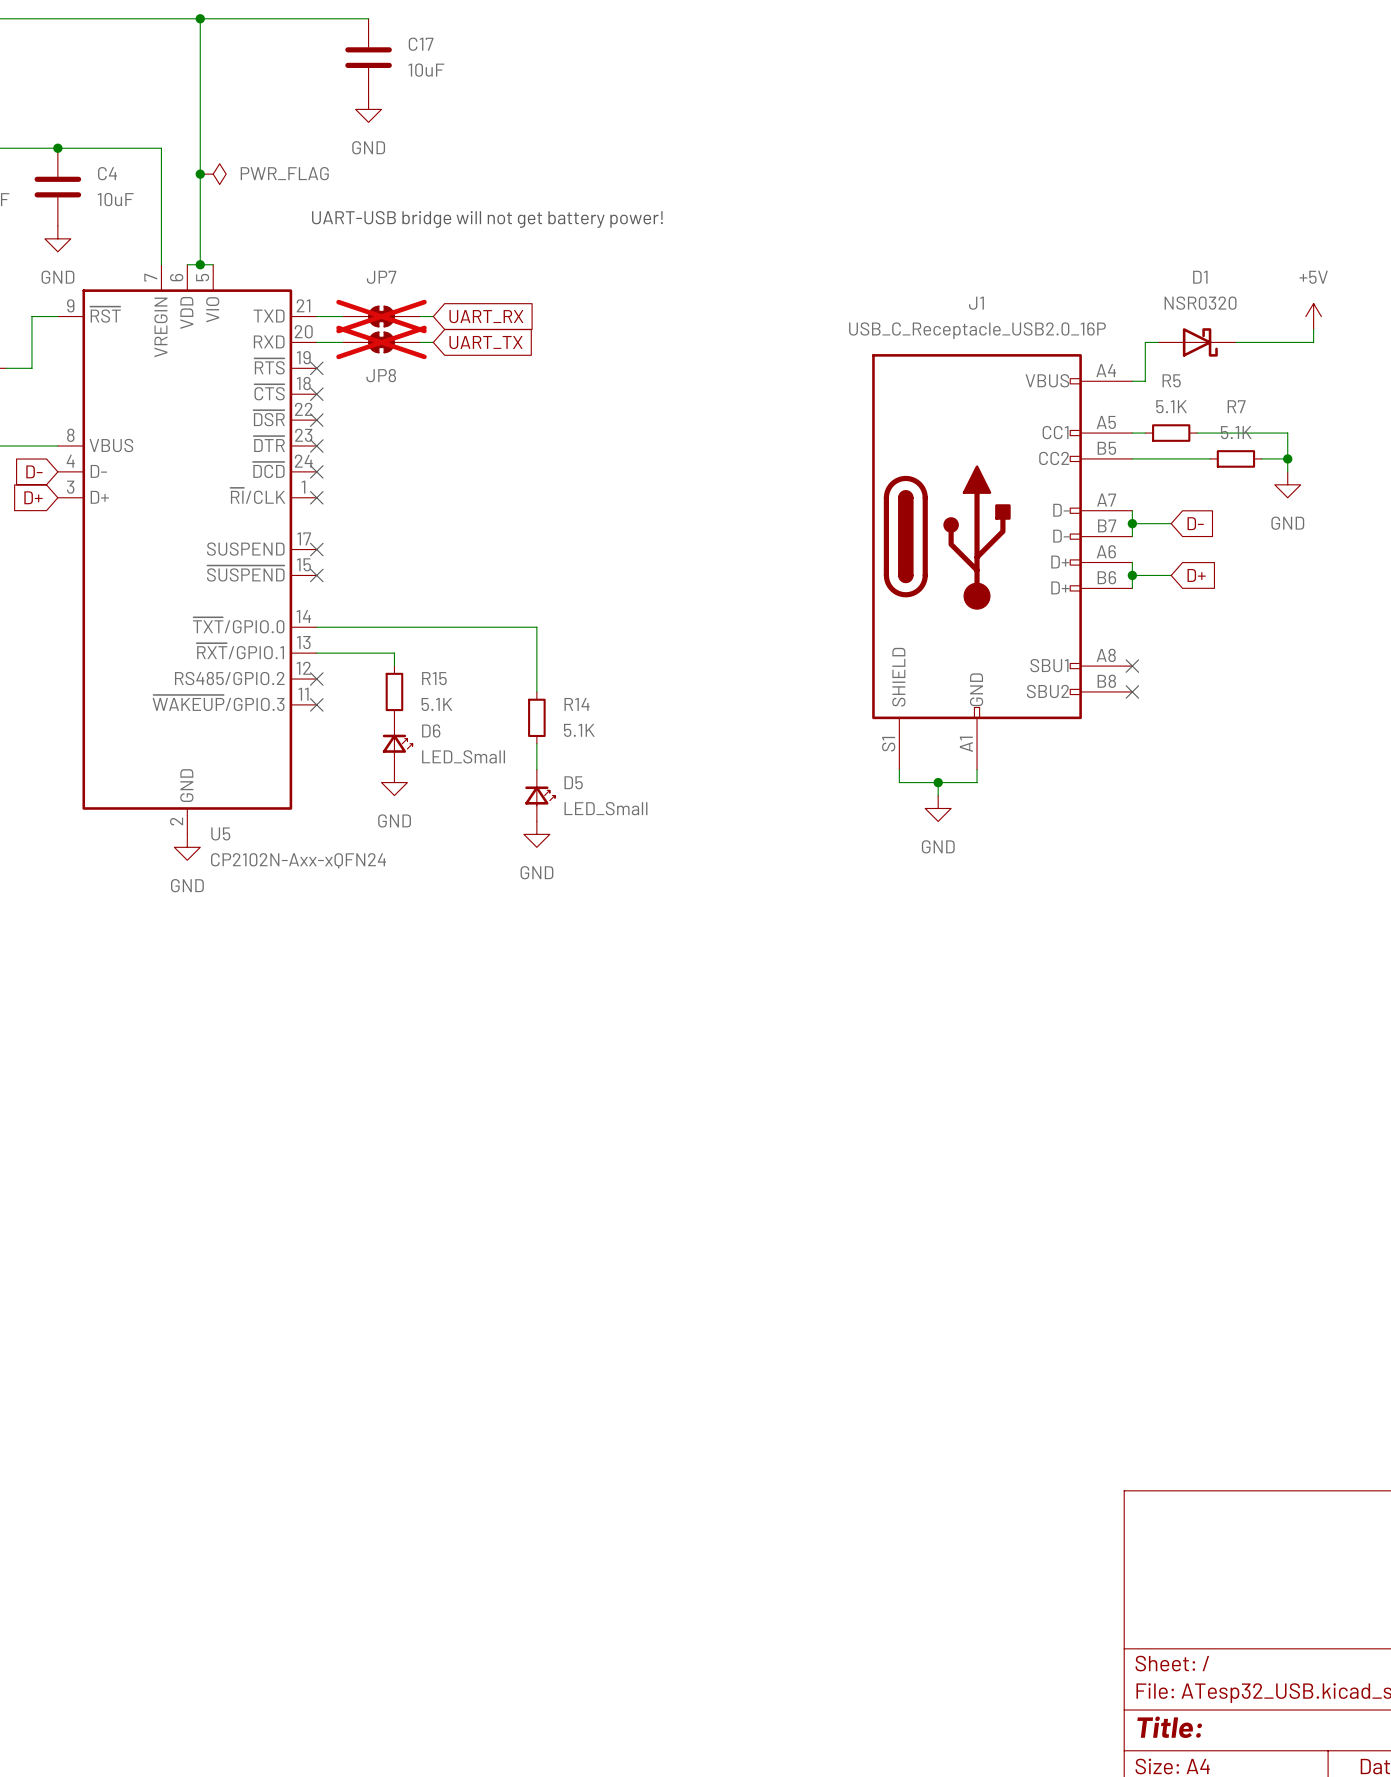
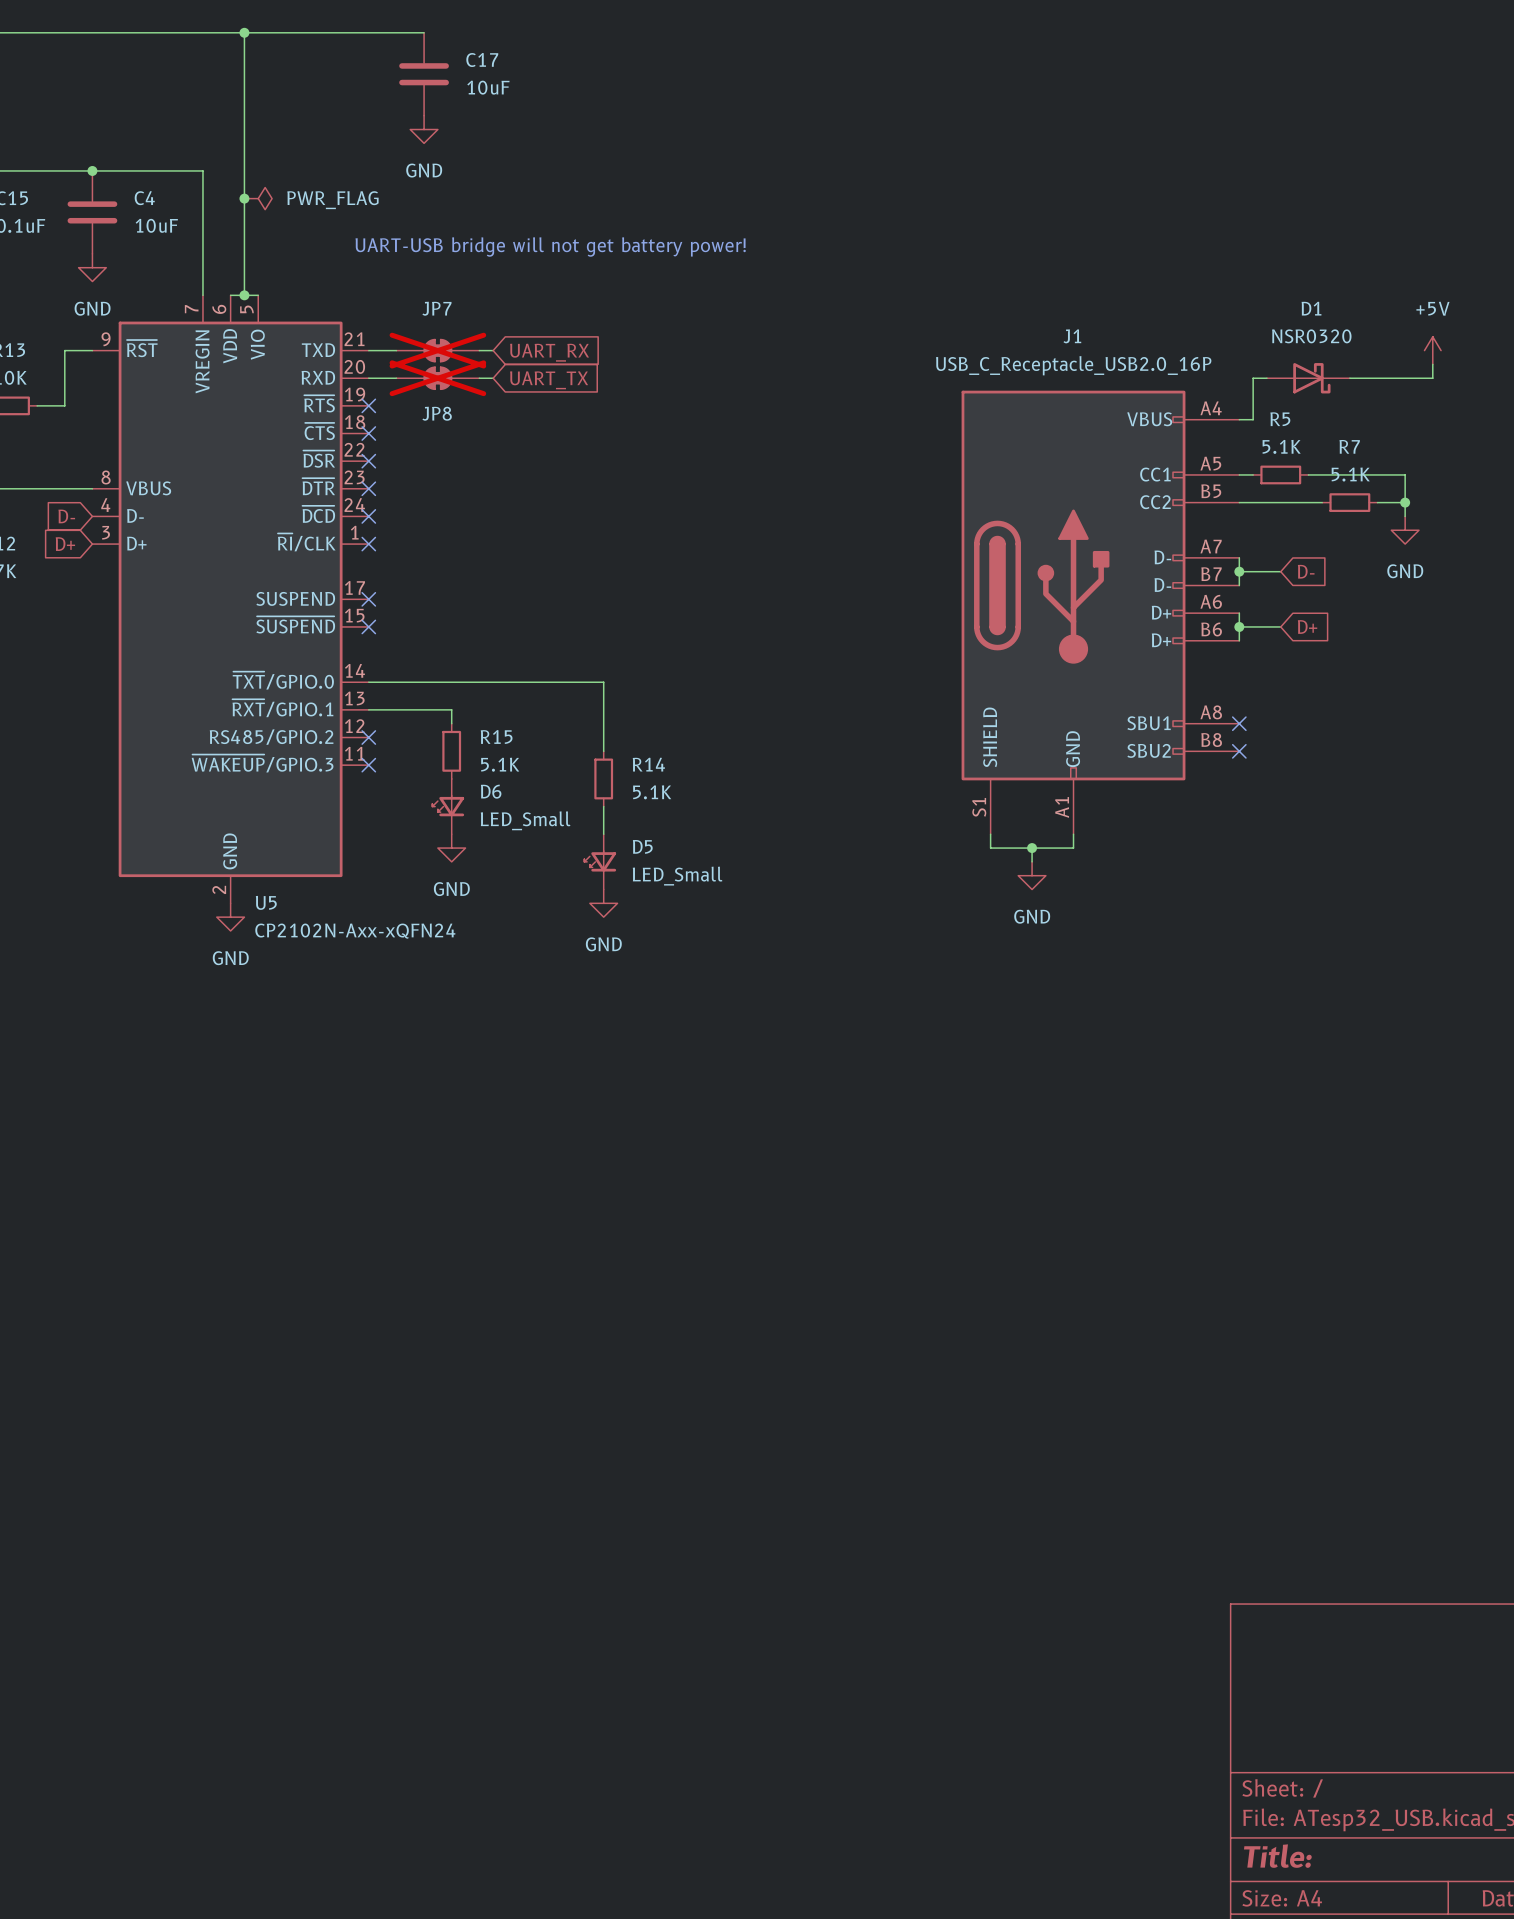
D6 rotation: 0° (397, 744) -> 180° (448, 805)
D5 rotation: 0° (540, 796) -> 180° (600, 861)

